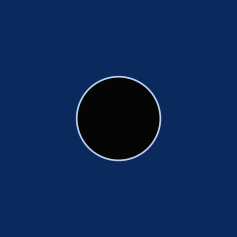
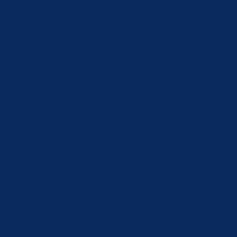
part: (118, 118) -> none

